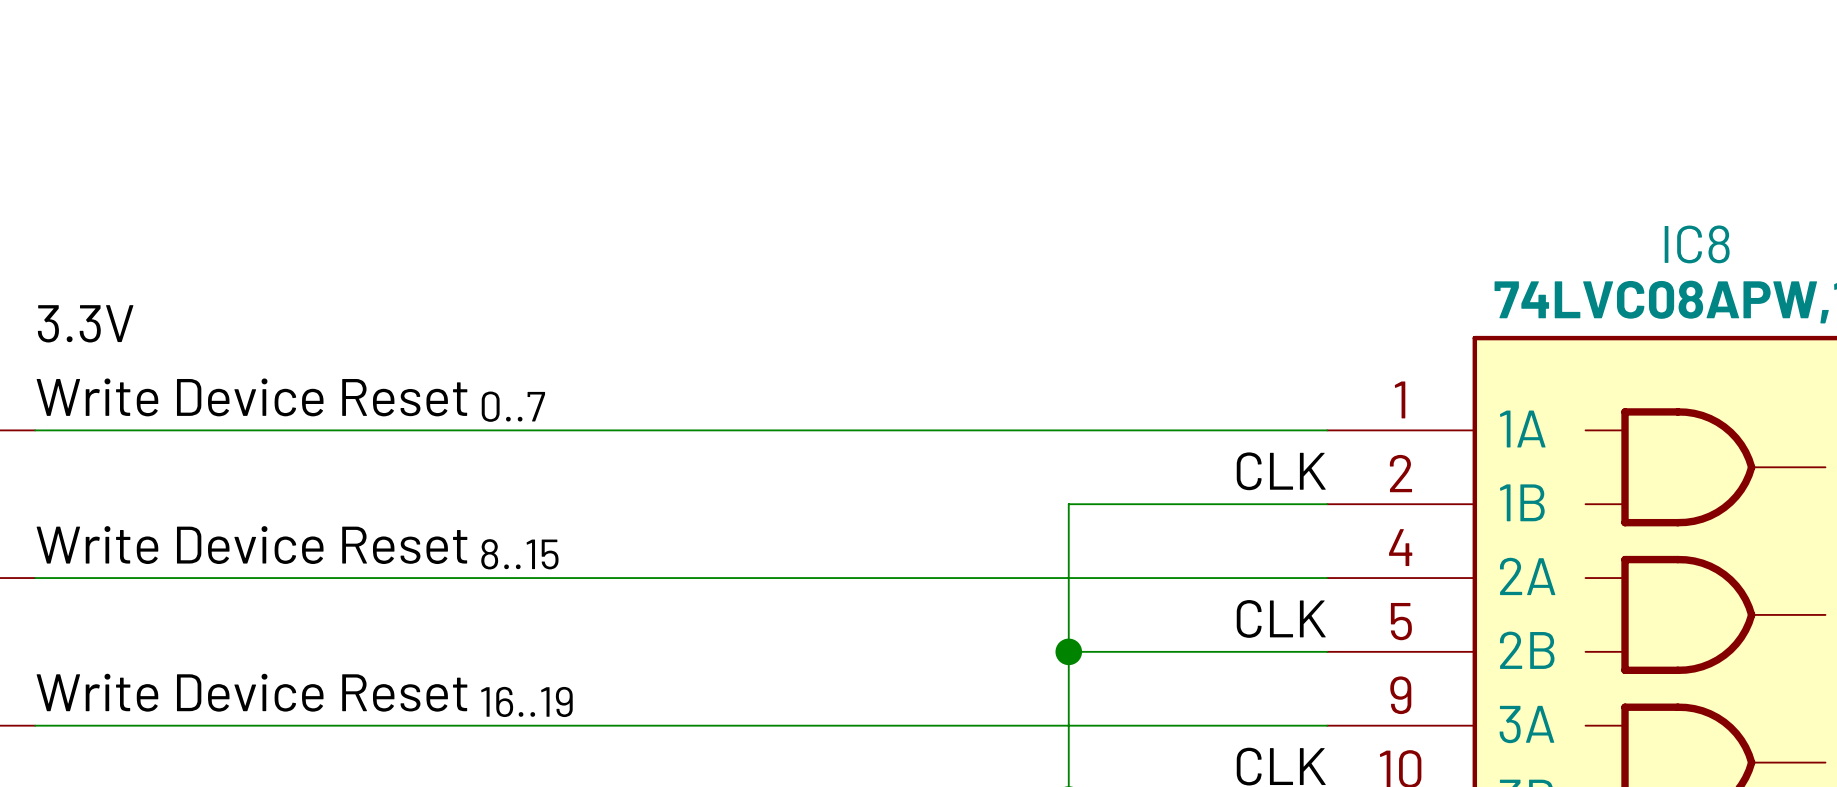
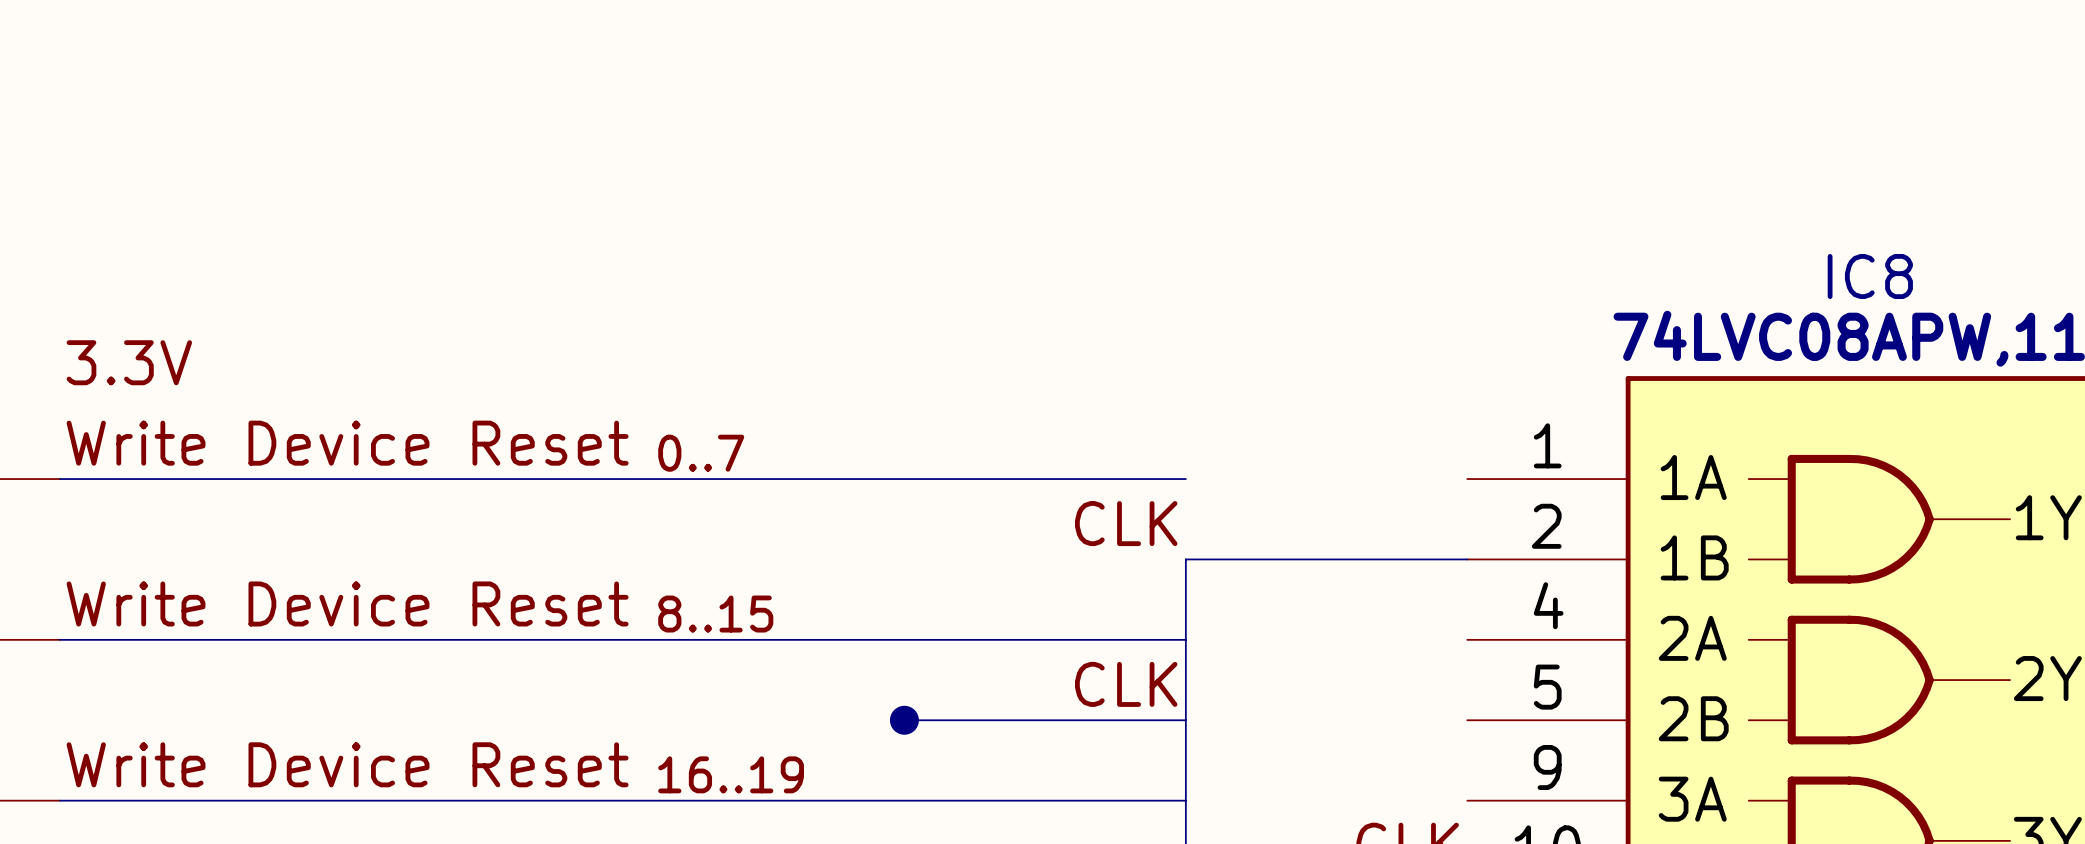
wire: (1068, 430) (1327, 430) -> none
label: none -> CLK (1126, 523)
label: CLK (1281, 471) -> none
wire: (1068, 578) (1327, 578) -> none
label: none -> CLK (1126, 684)
label: CLK (1281, 618) -> none
junction: none -> (904, 720)
wire: (1068, 651) (1327, 651) -> (1185, 720) (904, 720)
junction: (1068, 651) -> none
wire: (1068, 725) (1327, 725) -> none

